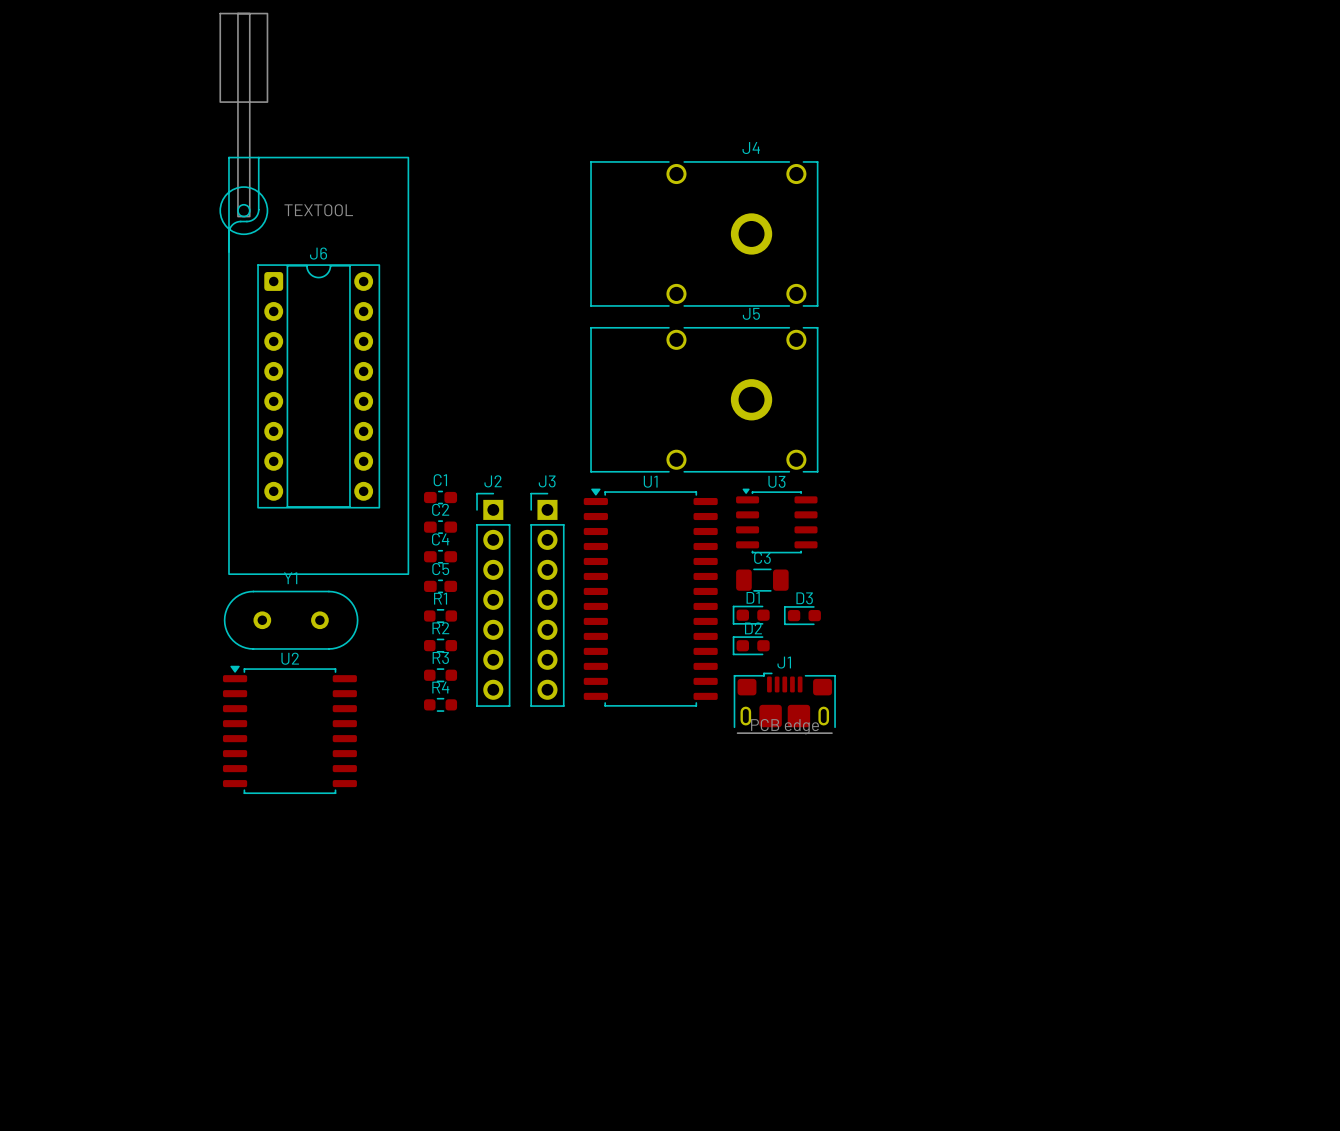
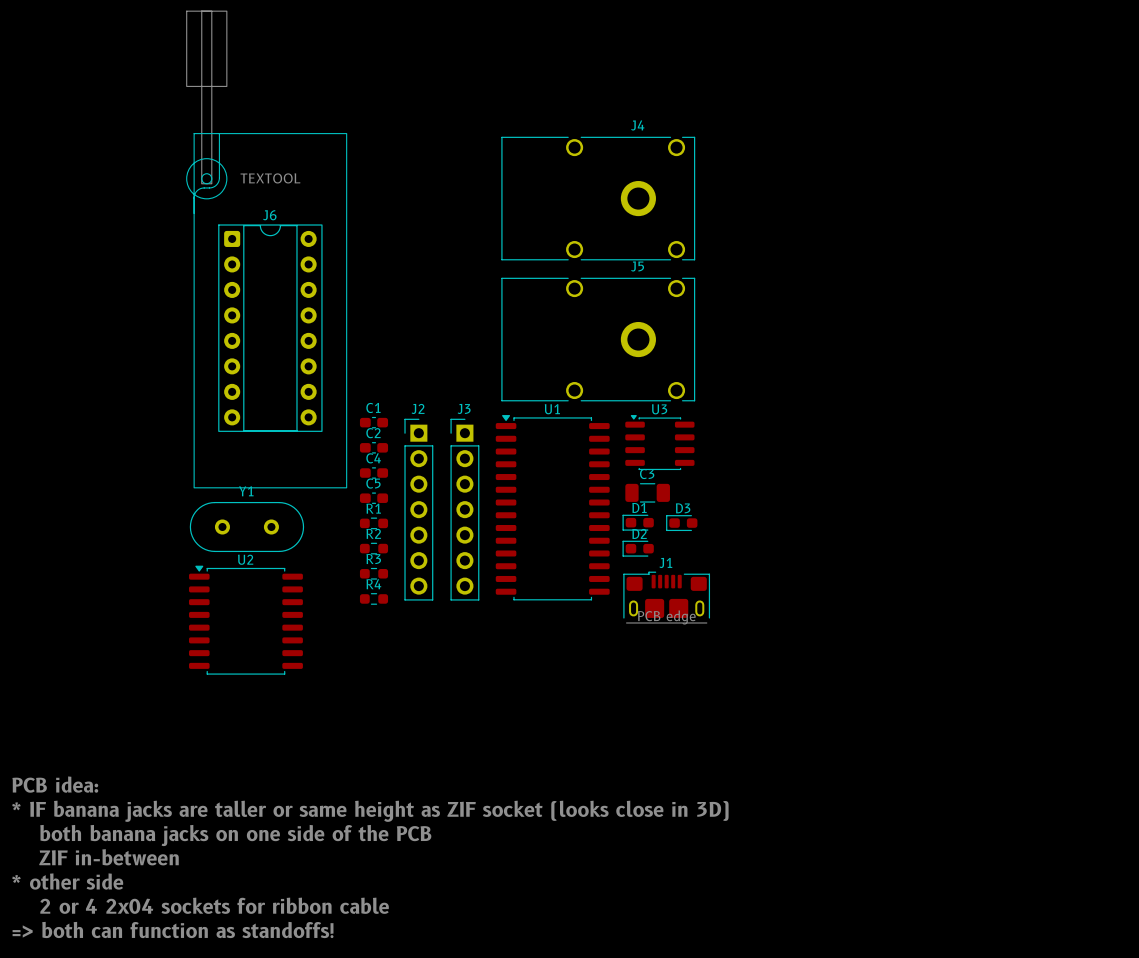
text: none -> PCB idea: (55, 784)
text: none -> * IF banana jacks are taller or same height as ZIF socket (looks close in 3D) (370, 811)
text: none -> both banana jacks on one side of the PCB (235, 835)
text: none -> ZIF in-between (108, 857)
text: none -> * other side (67, 881)
text: none -> 2 or 4 2x04 sockets for ribbon cable (214, 905)
text: none -> => both can function as standoffs! (173, 929)

